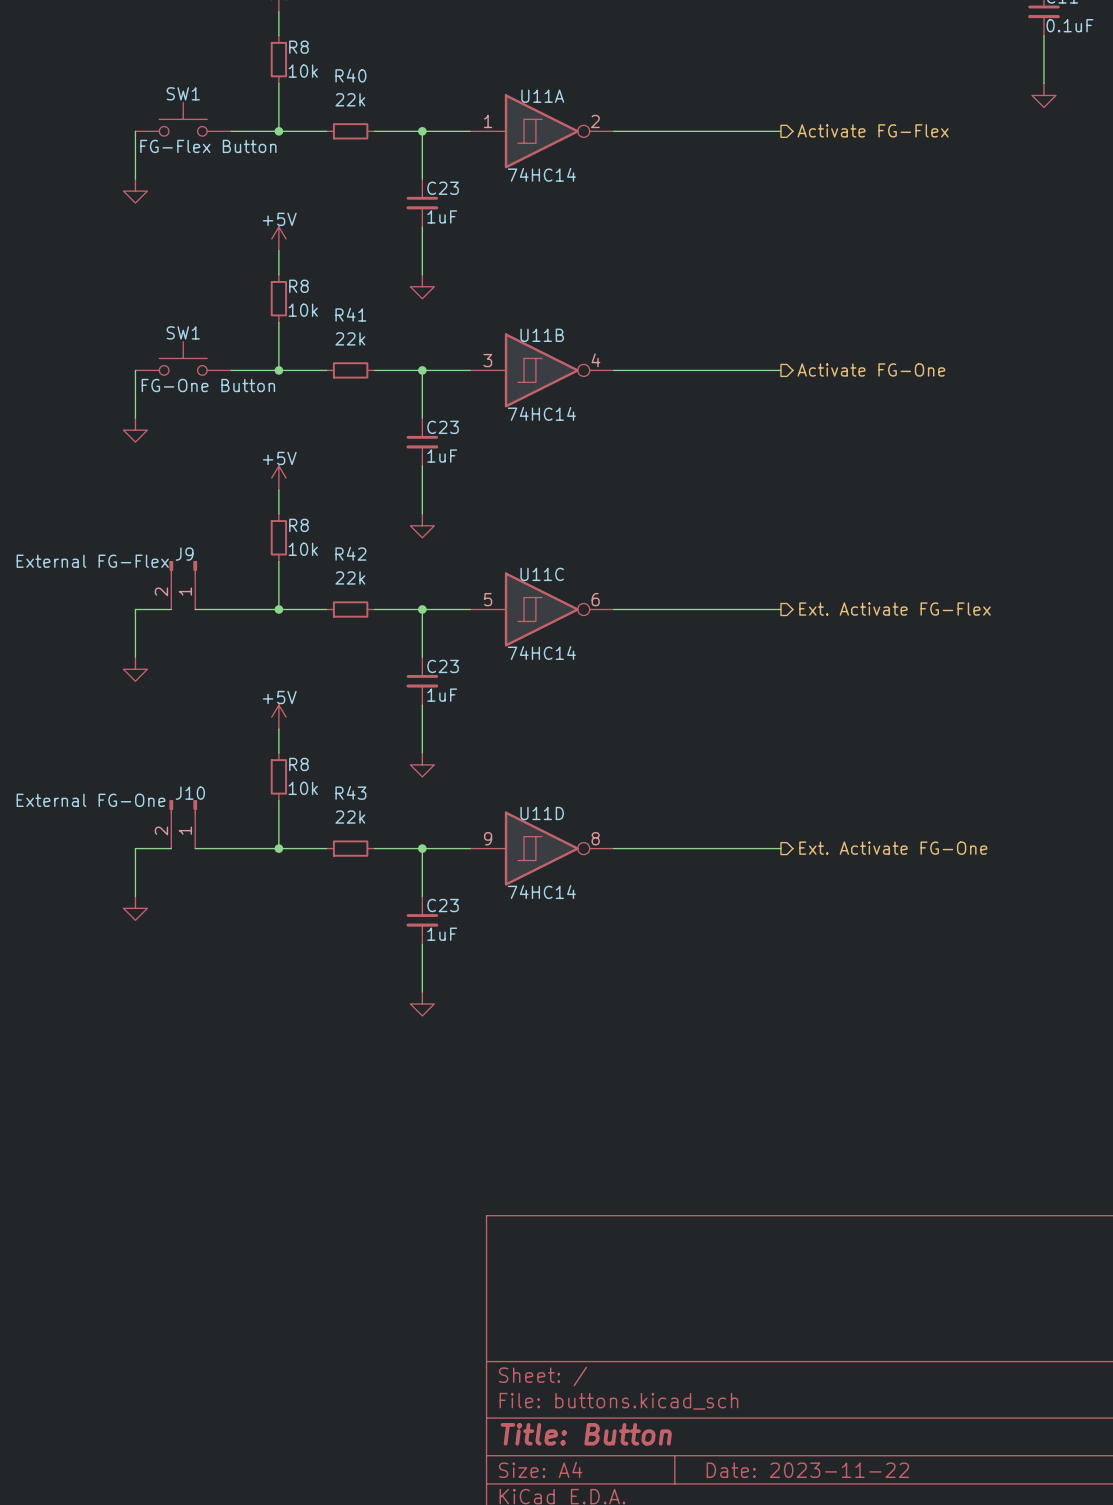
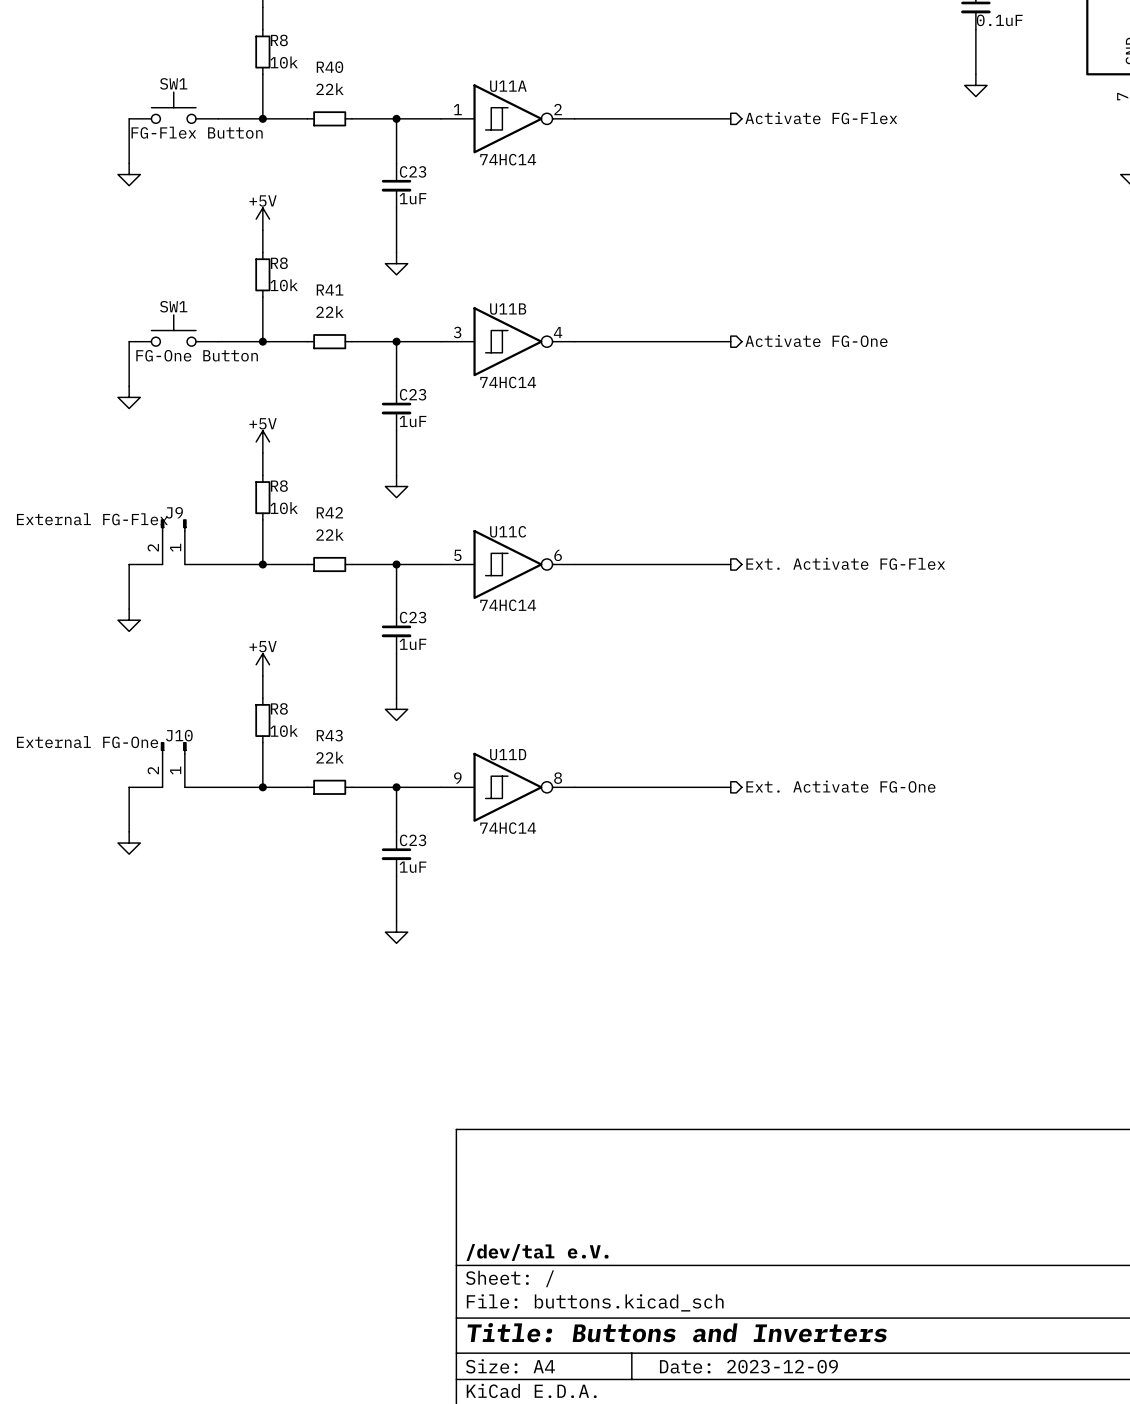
title block: none -> /dev/tal e.V. (537, 1252)
title block: Title: Button (586, 1434) -> Title: Buttons and Inverters (677, 1332)
title block: Date: 2023-11-22 (807, 1470) -> Date: 2023-12-09 (748, 1366)

